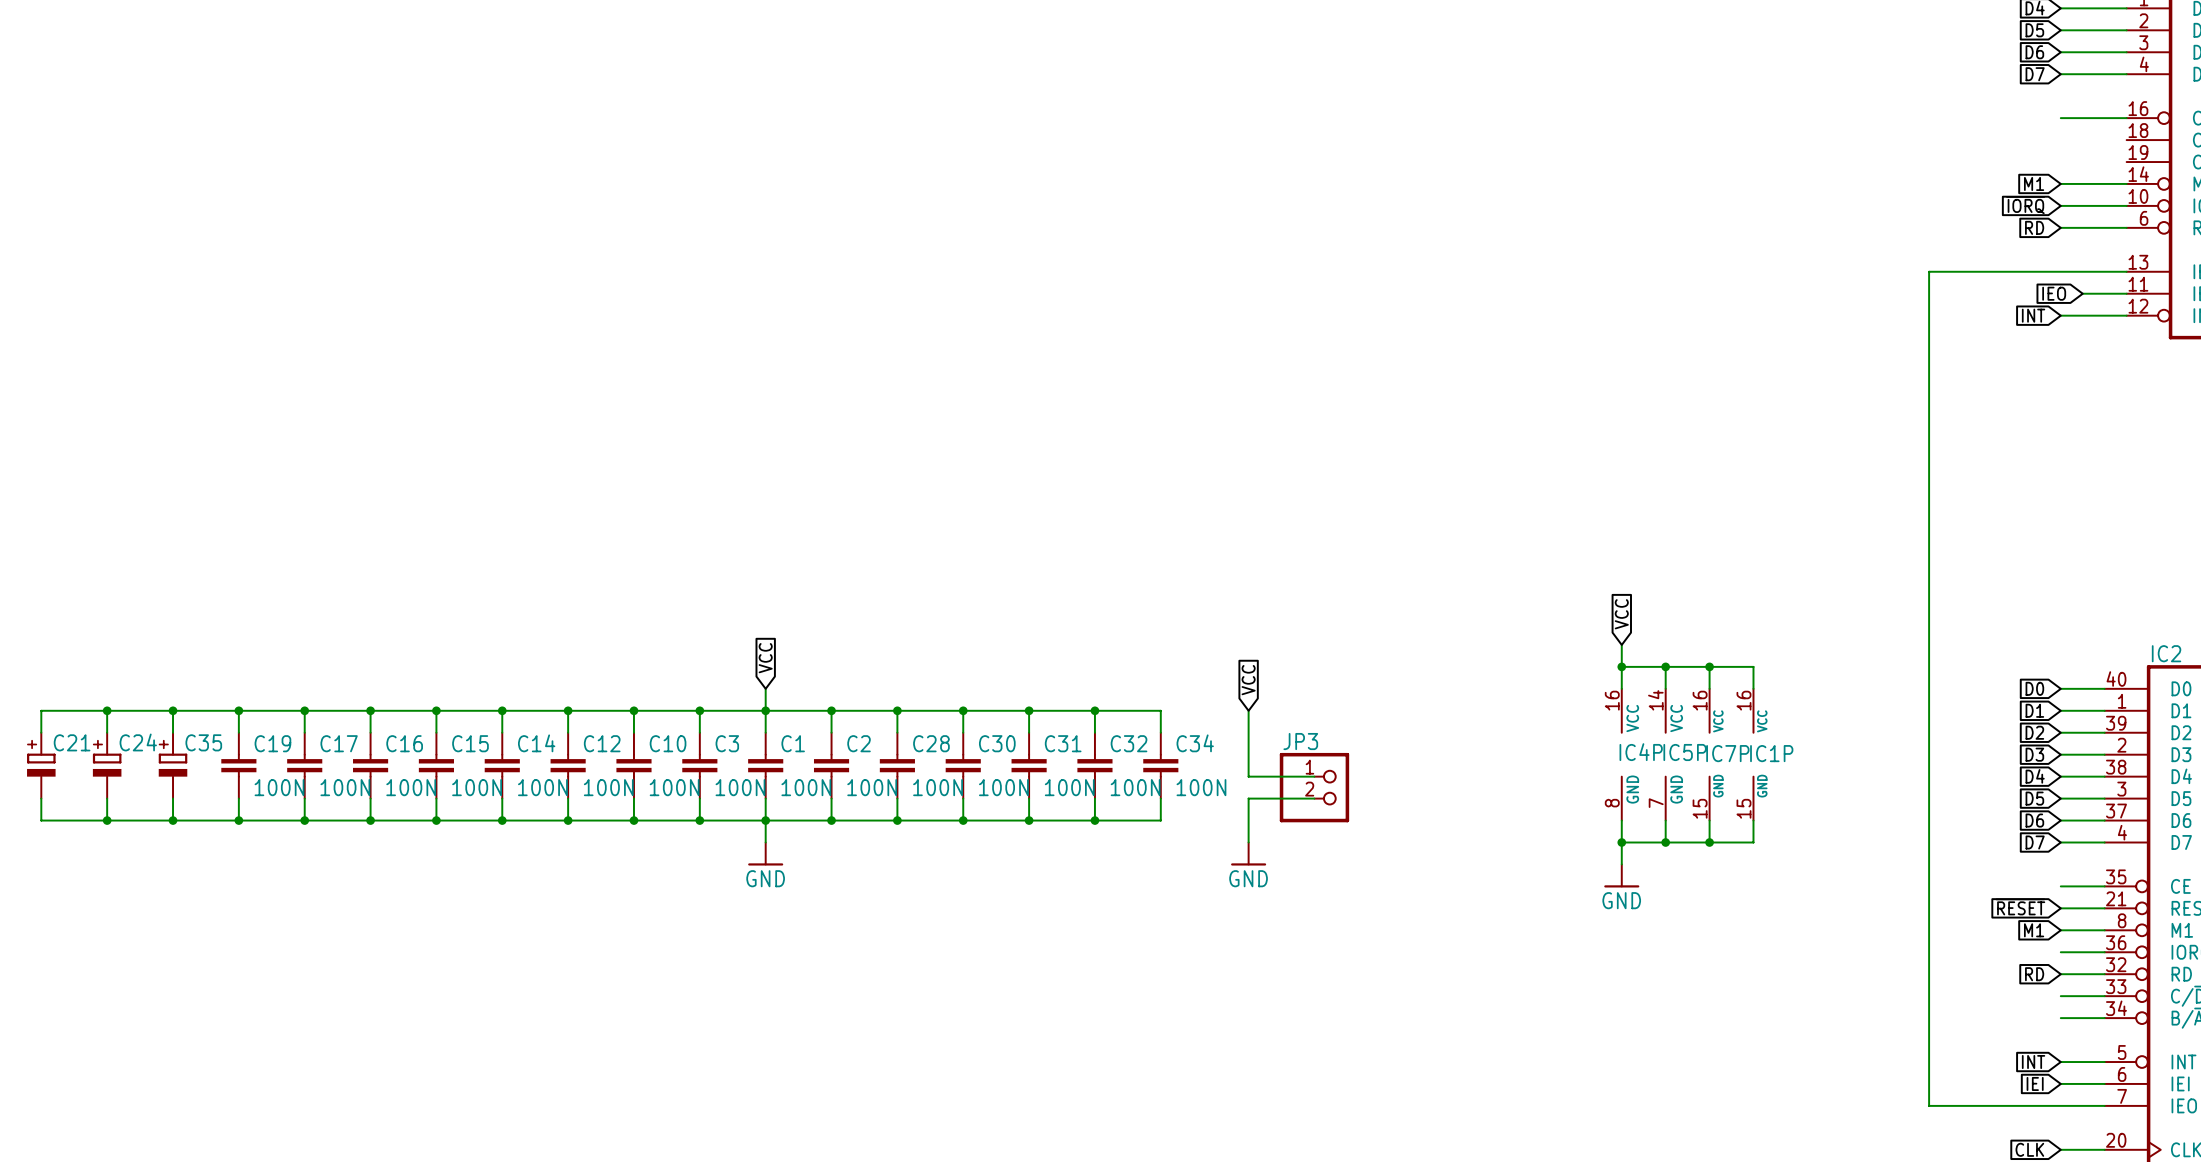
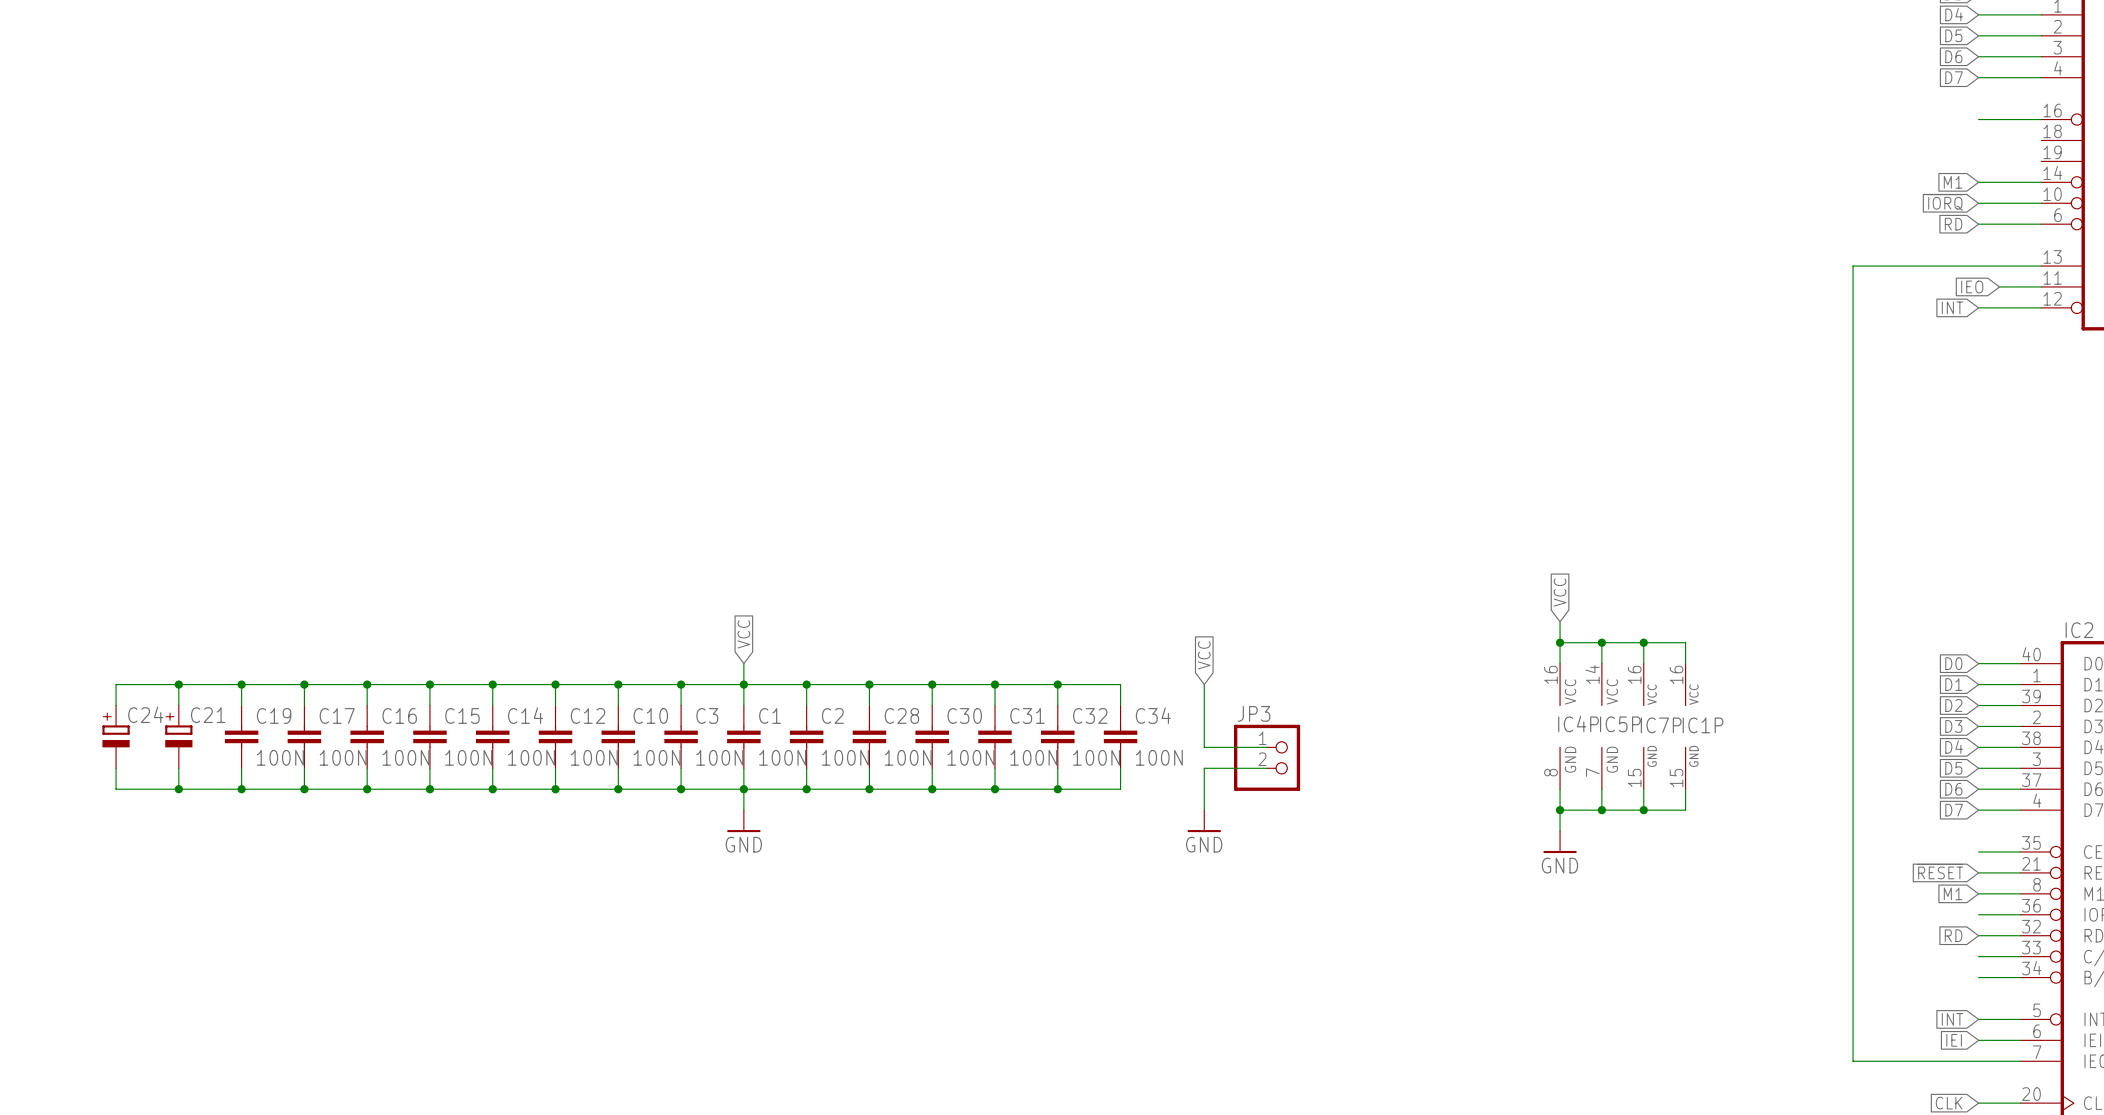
wire: (107, 710) (41, 710) (41, 732) -> none
junction: (107, 710) -> none
C35 name: C35 (203, 742) -> C21 (208, 715)
C21: (41, 765) -> none
wire: (41, 798) (41, 820) (107, 820) -> none
junction: (107, 820) -> none

